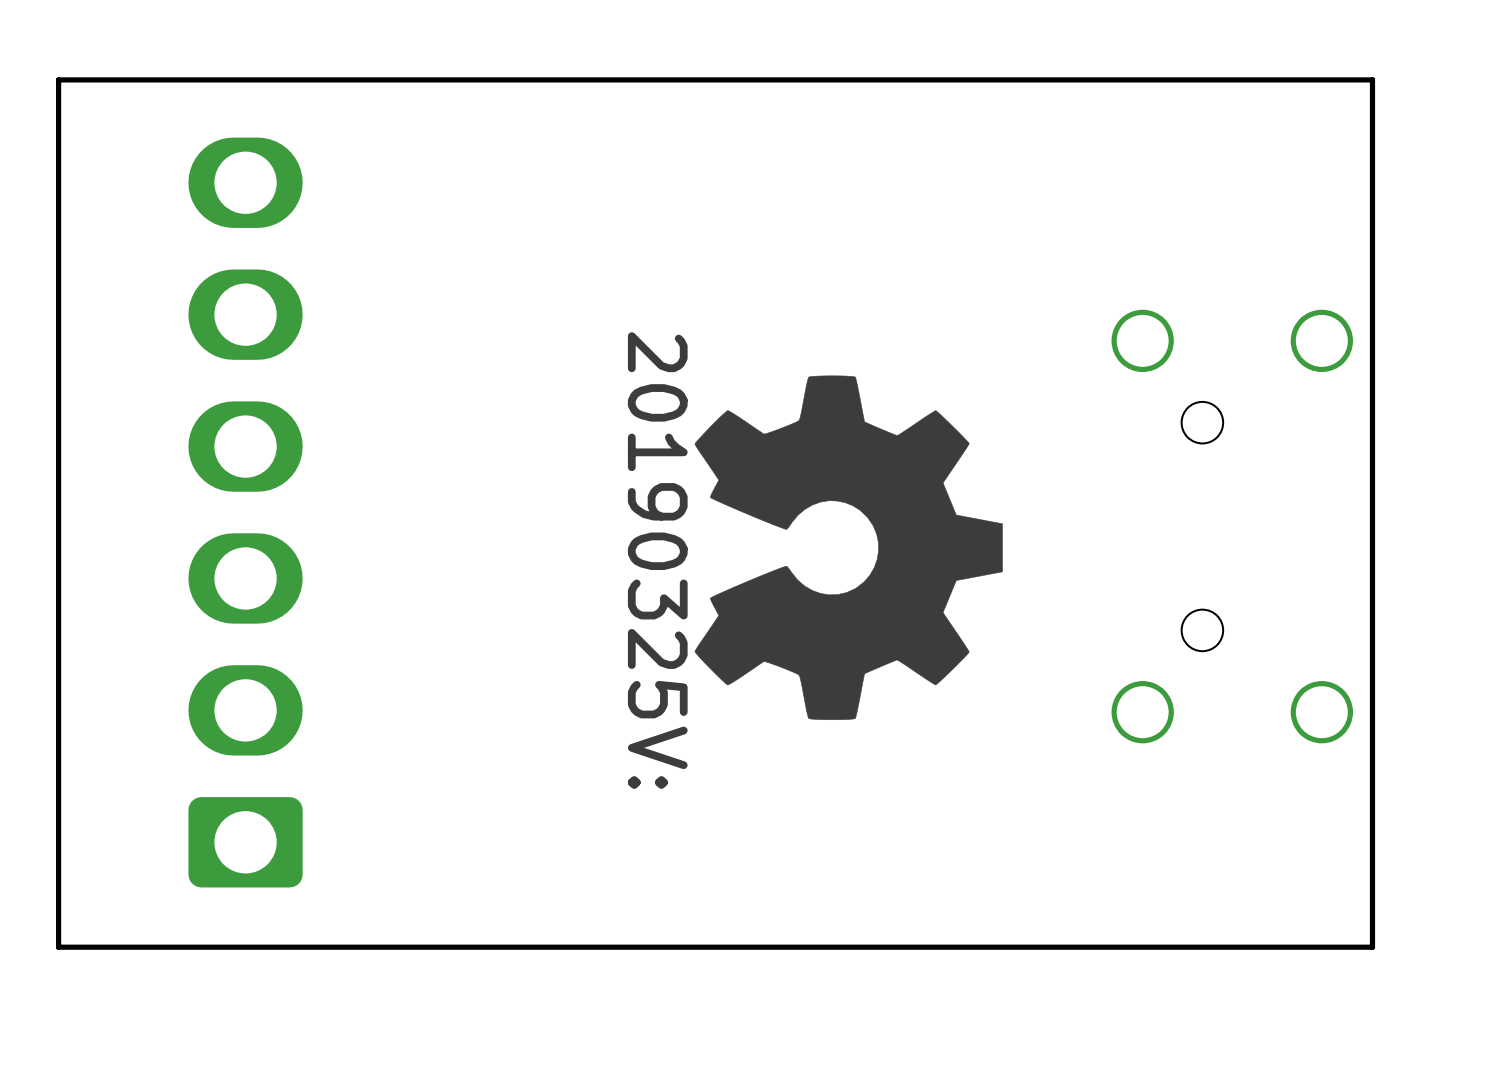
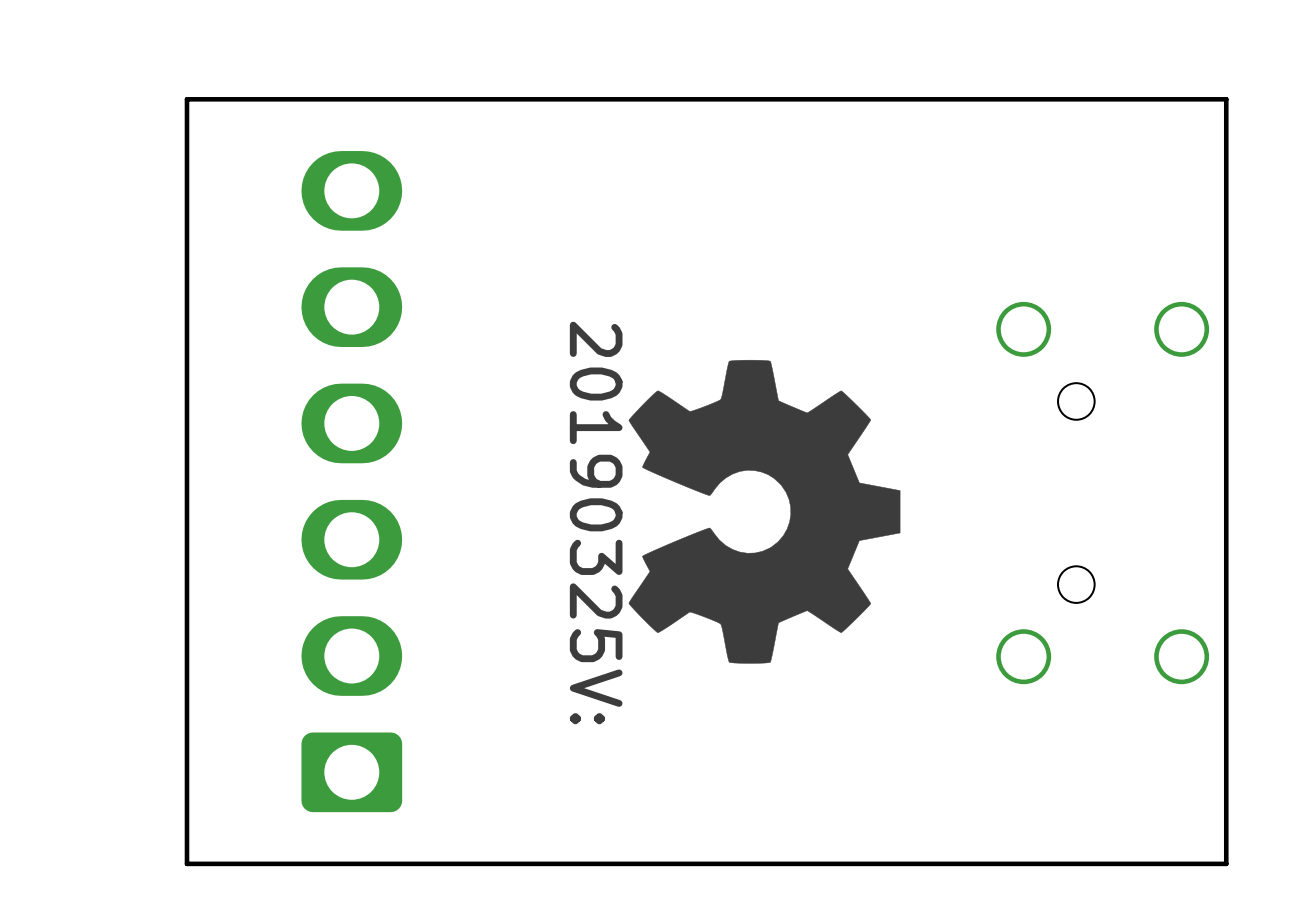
board edge: (193, 79) (58, 79) (58, 947) (193, 947) -> (186, 99) (186, 863)
part position: (245, 512) -> (351, 481)

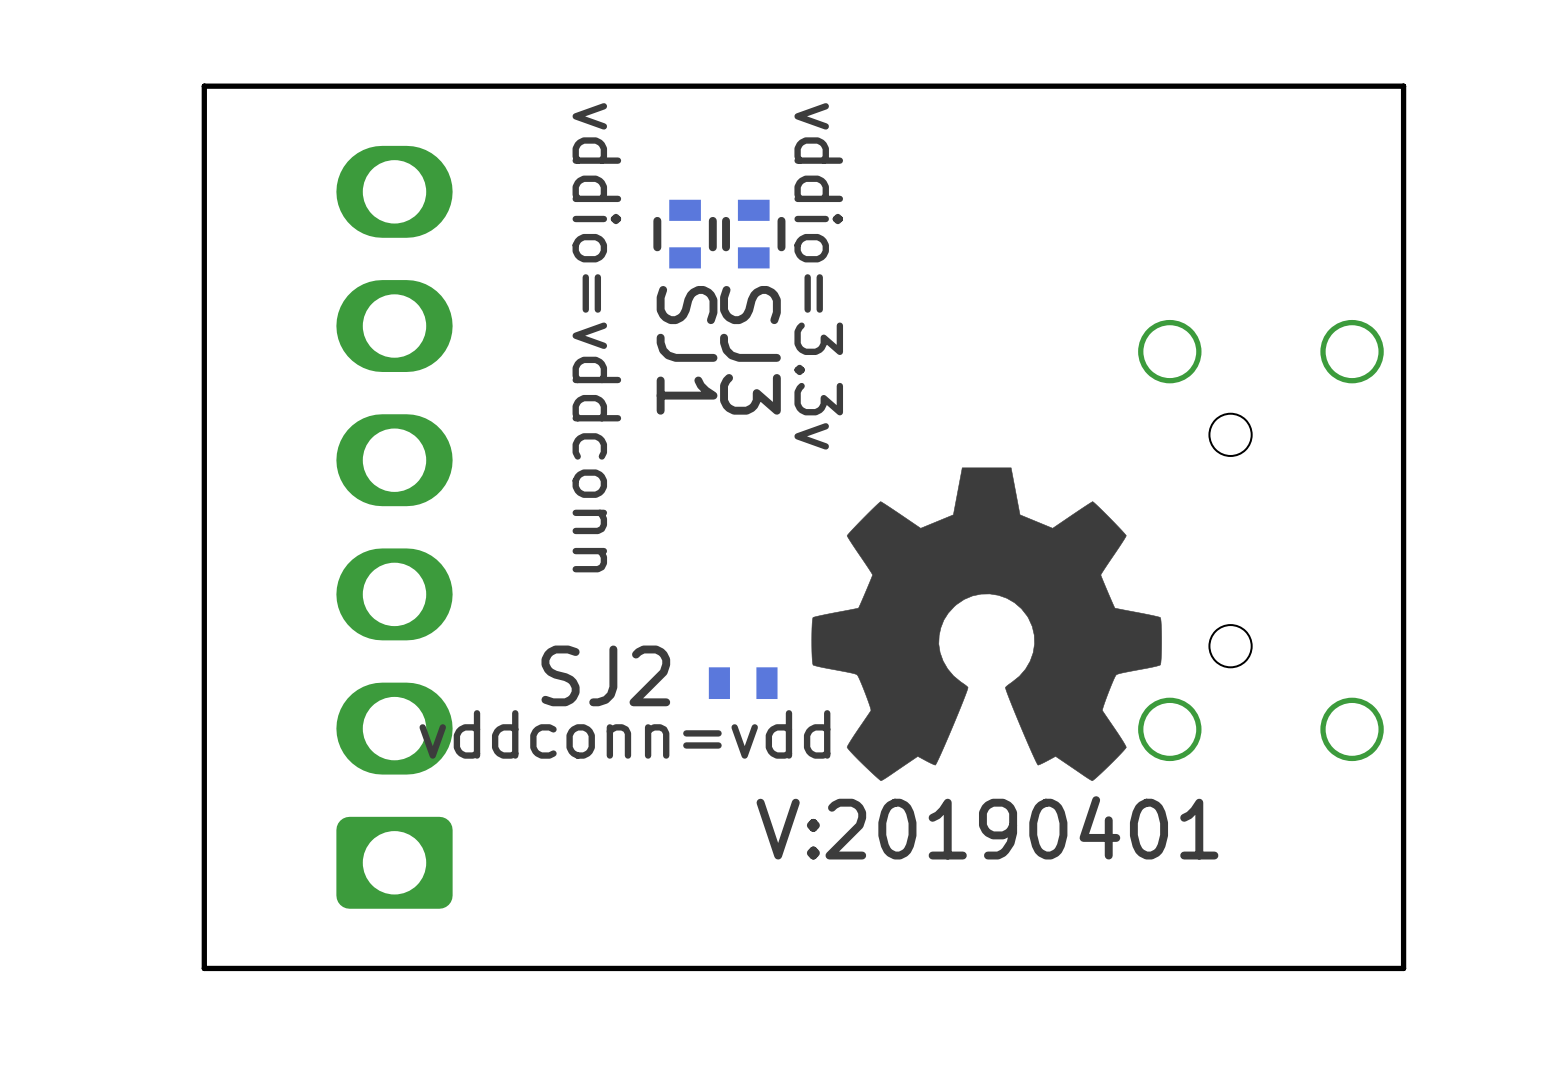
SJ1: none -> vddio=vddconn (685, 234)
SJ3: none -> vddio=3.3v (753, 234)
drawing: [628, 359, 901, 664] -> none
drawing: none -> [811, 467, 1162, 782]
SJ2: none -> vddconn=vdd (743, 683)

